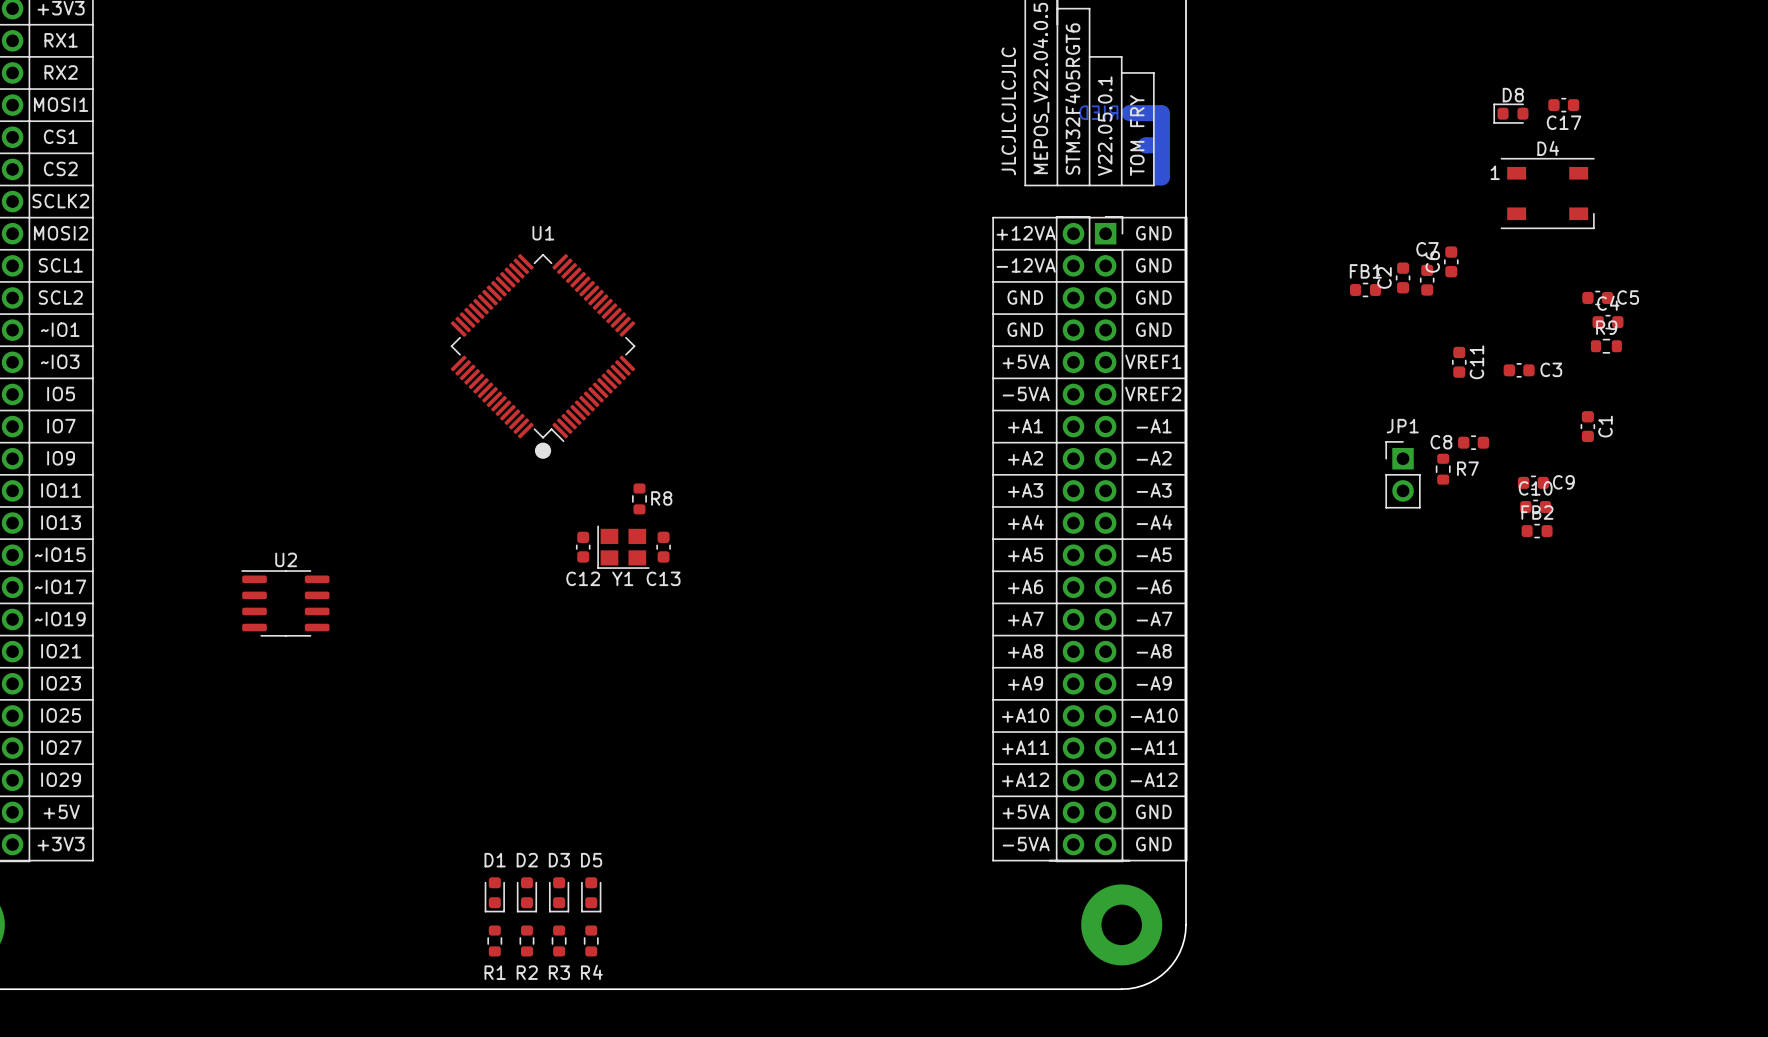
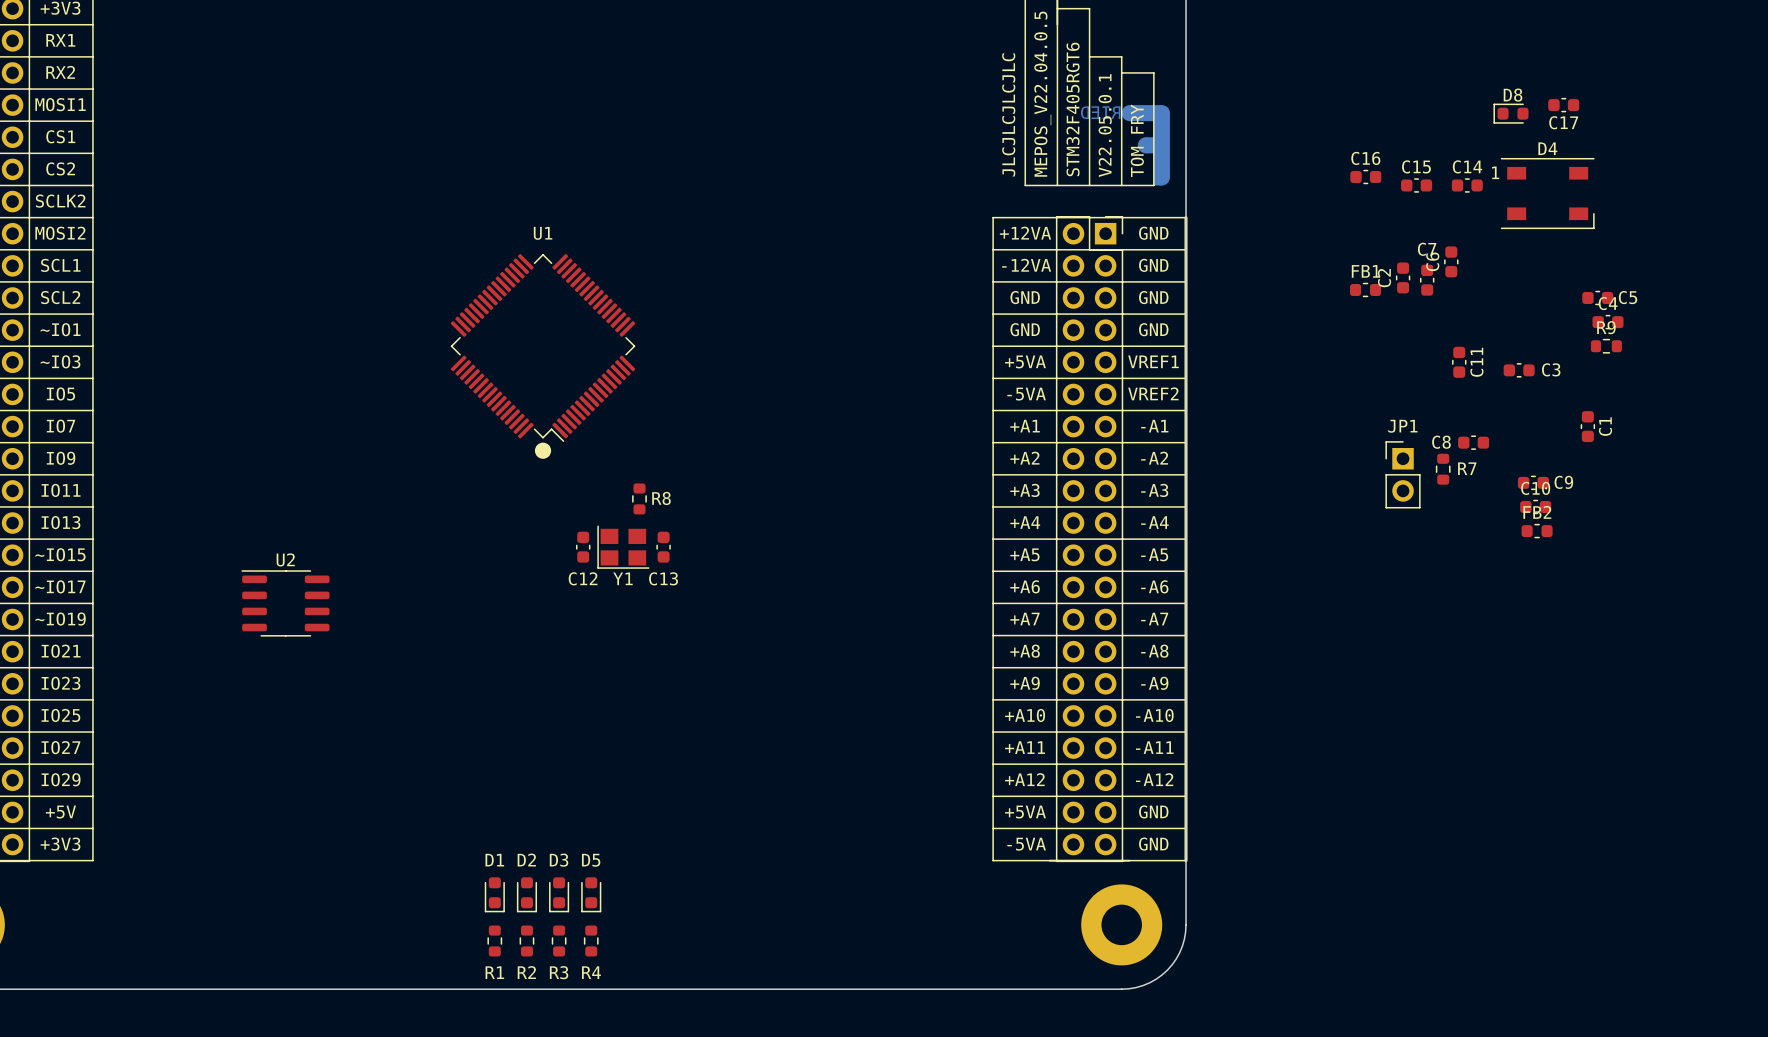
C16: none -> (1365, 177)
C15: none -> (1416, 185)
C14: none -> (1467, 185)

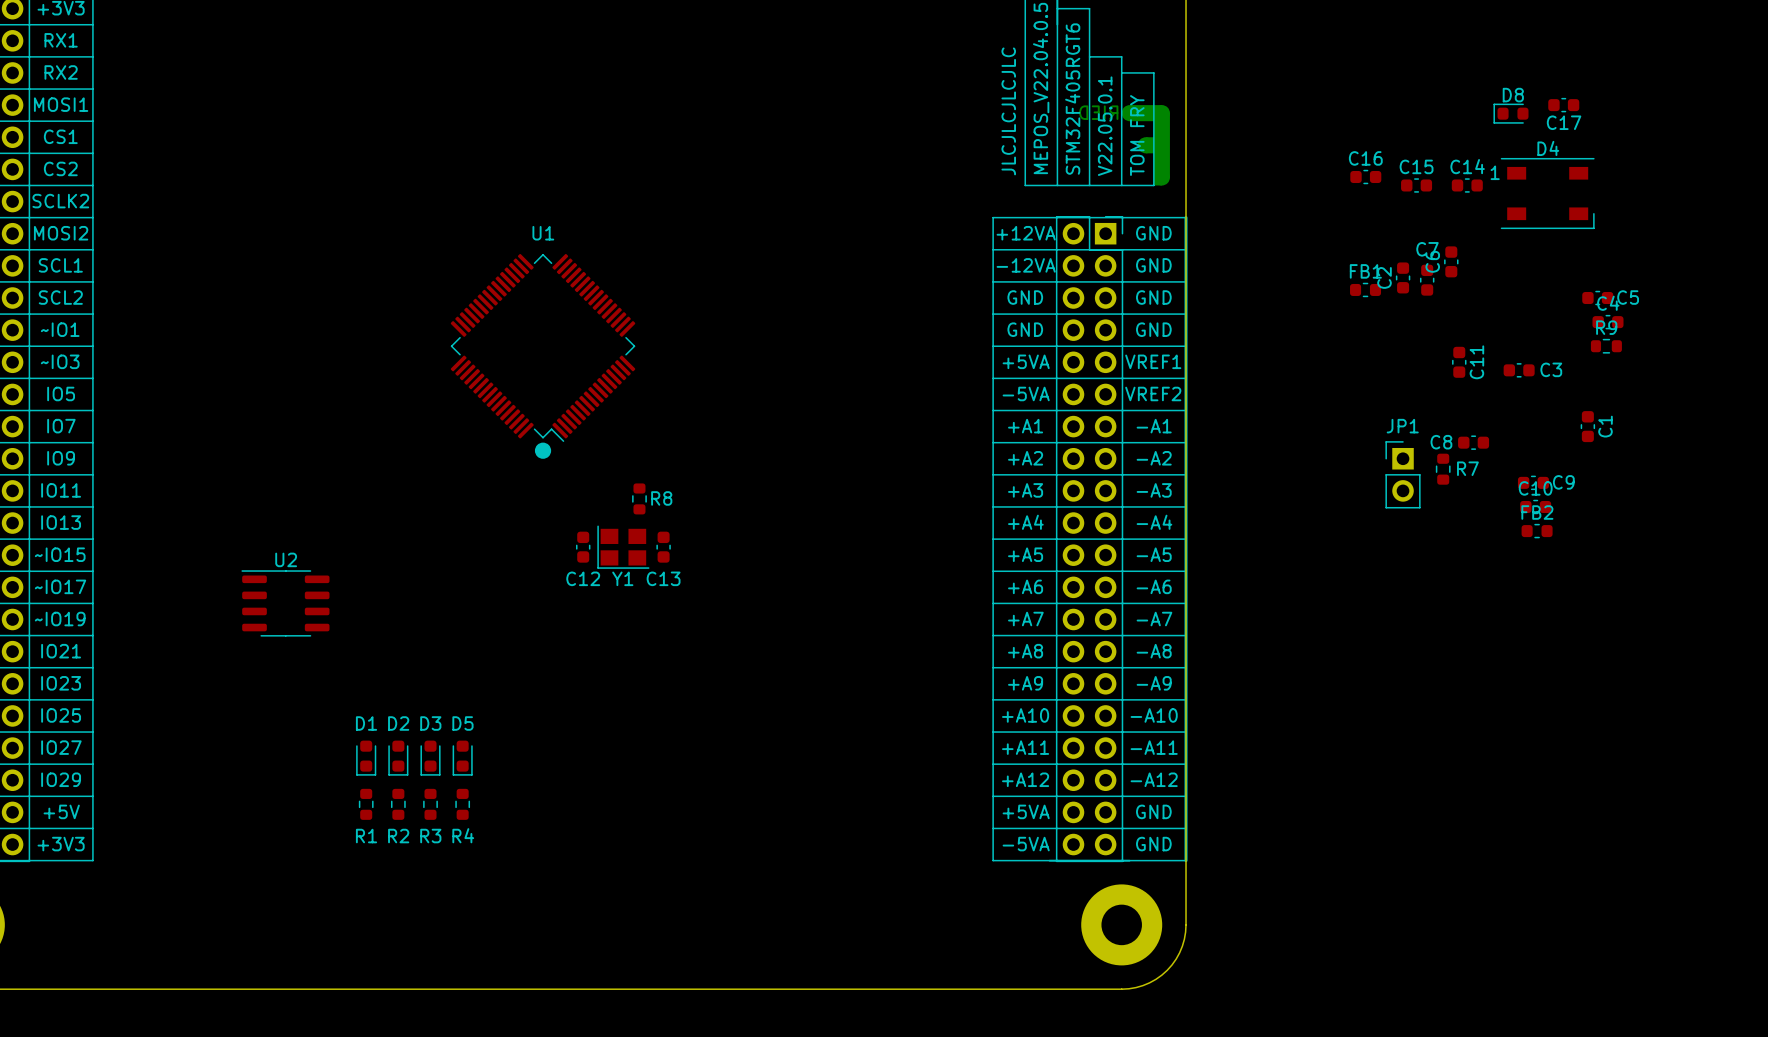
D1 position: (494, 894) -> (366, 758)
D2 position: (526, 894) -> (398, 758)
D3 position: (559, 894) -> (430, 758)
D5 position: (591, 894) -> (462, 758)
R1 position: (494, 940) -> (366, 804)
R2 position: (526, 940) -> (398, 804)
R3 position: (559, 940) -> (430, 804)
R4 position: (591, 940) -> (462, 804)

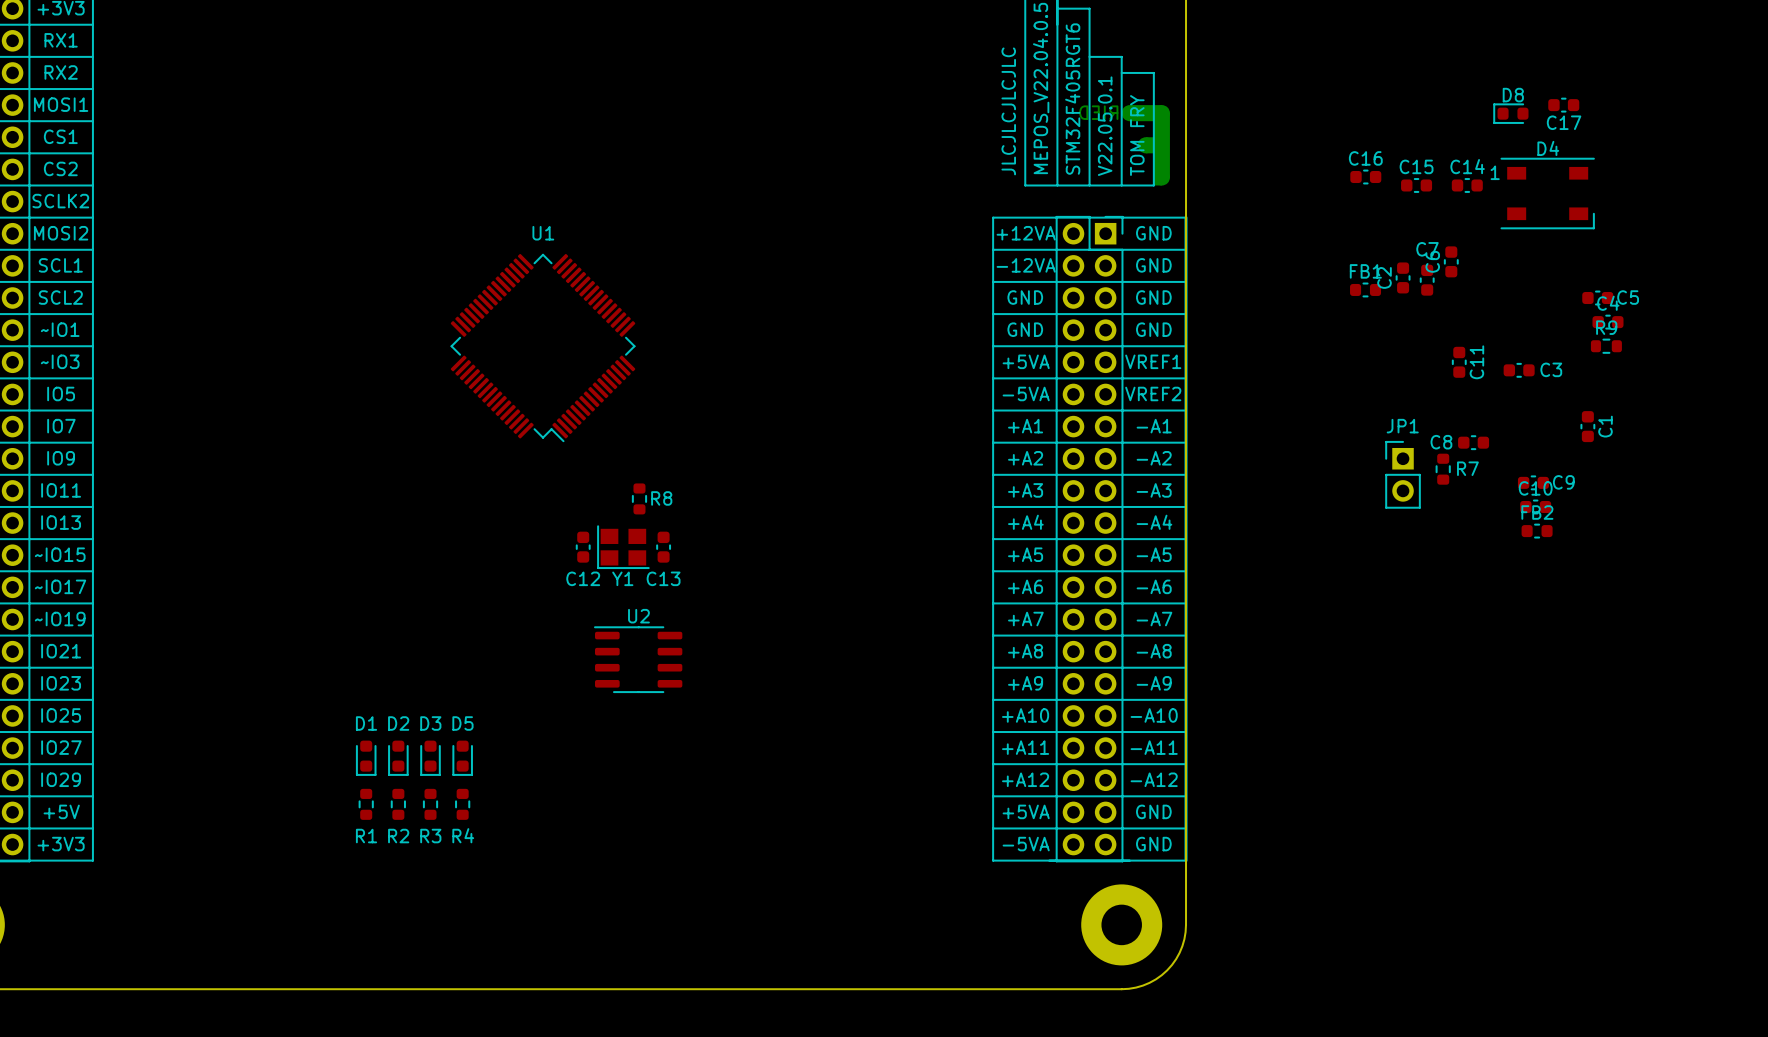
drawing: [534, 442, 552, 459] -> none
U2 position: (285, 603) -> (638, 659)

